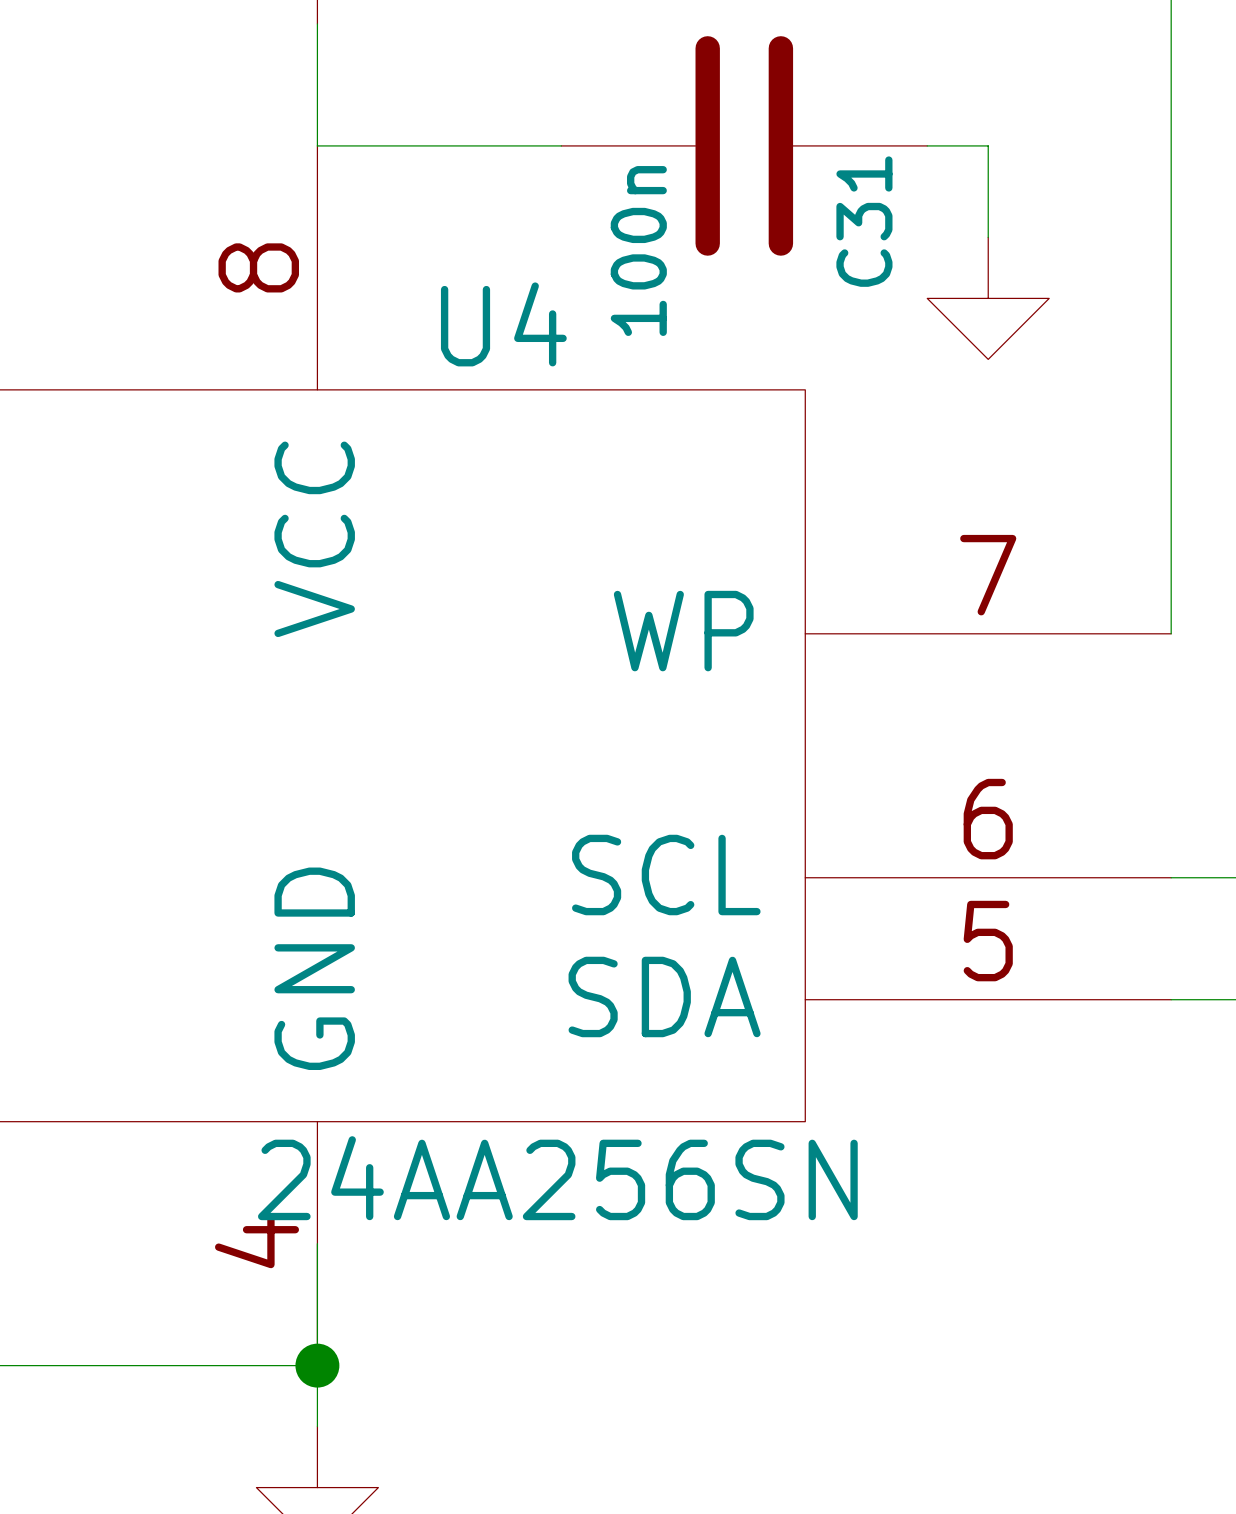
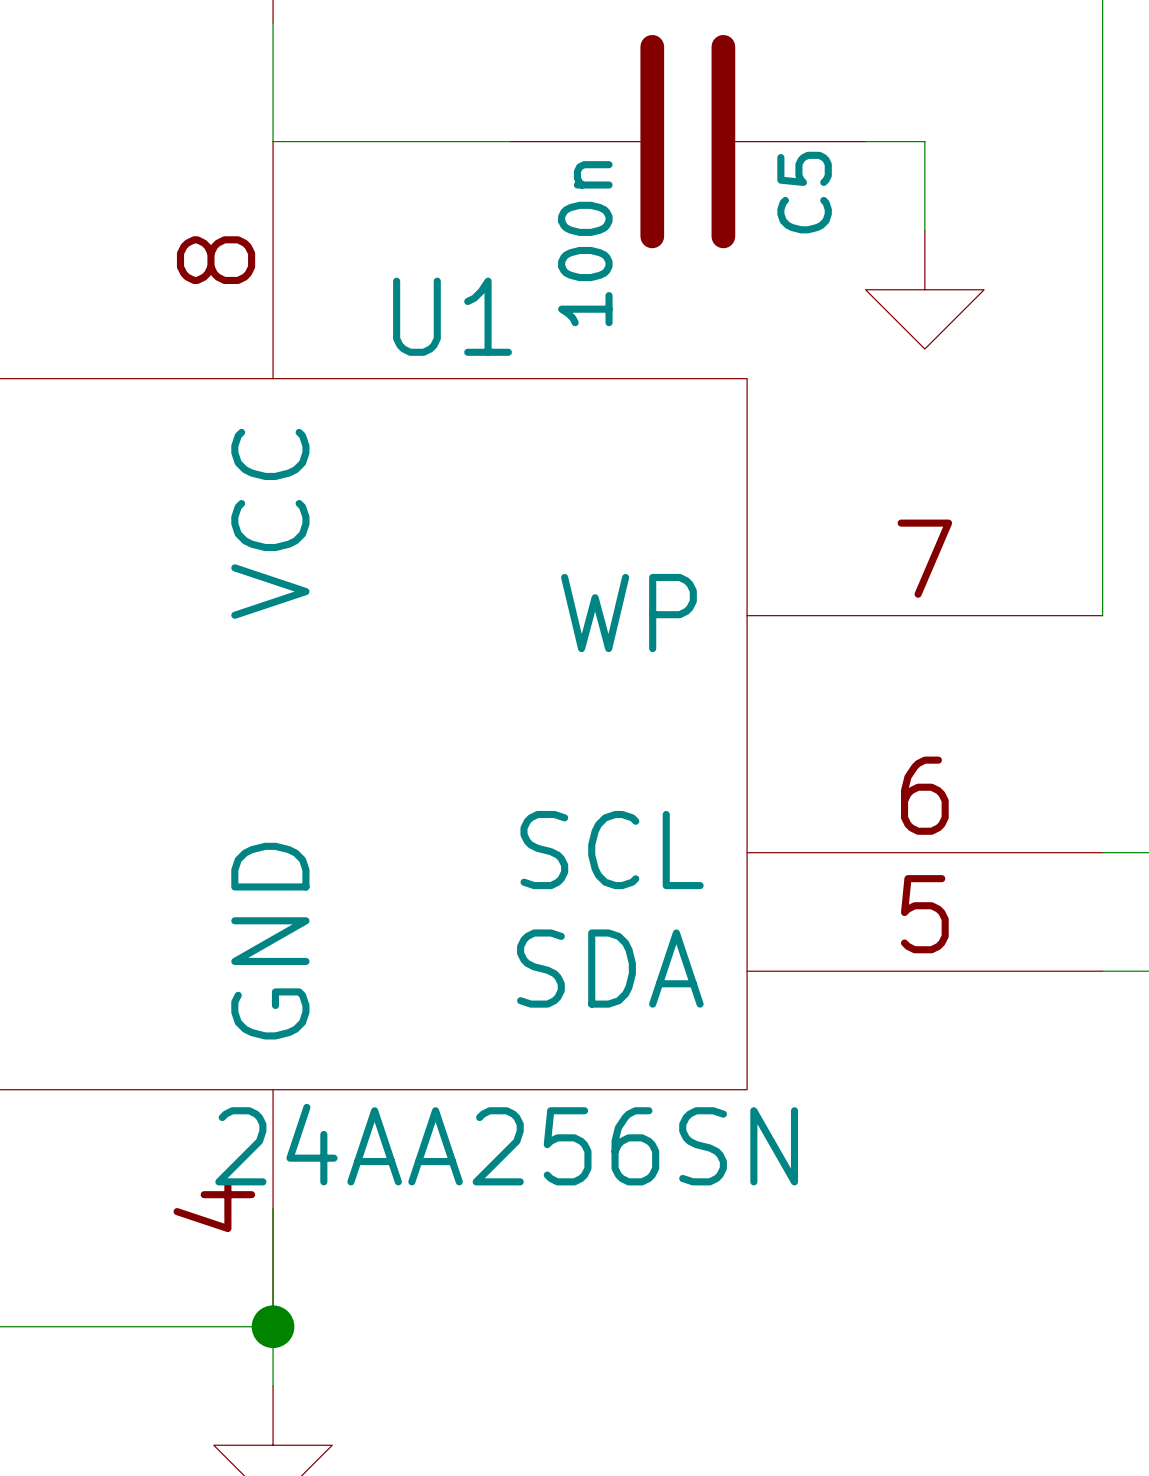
C31 name: C31 (864, 221) -> C5 (804, 192)
U4 name: U4 (503, 324) -> U1 (452, 316)

